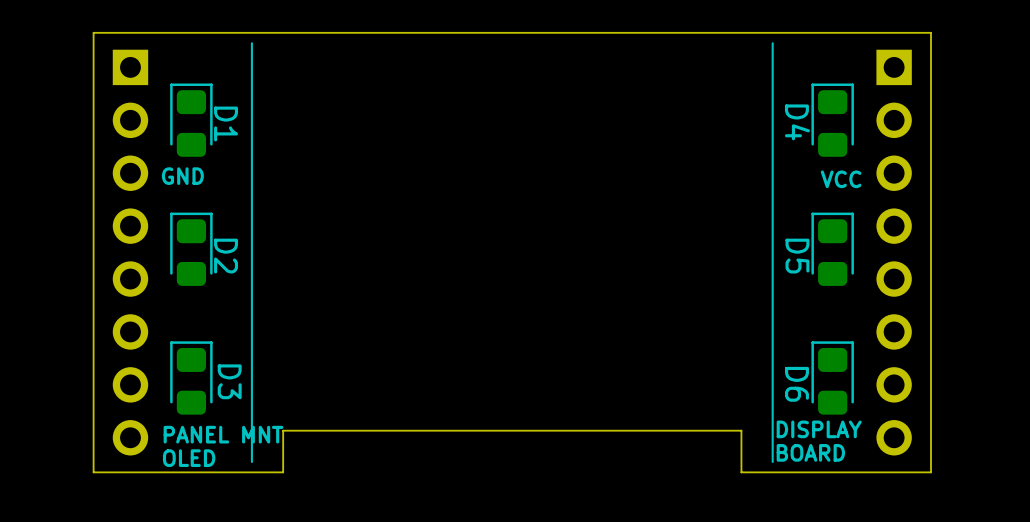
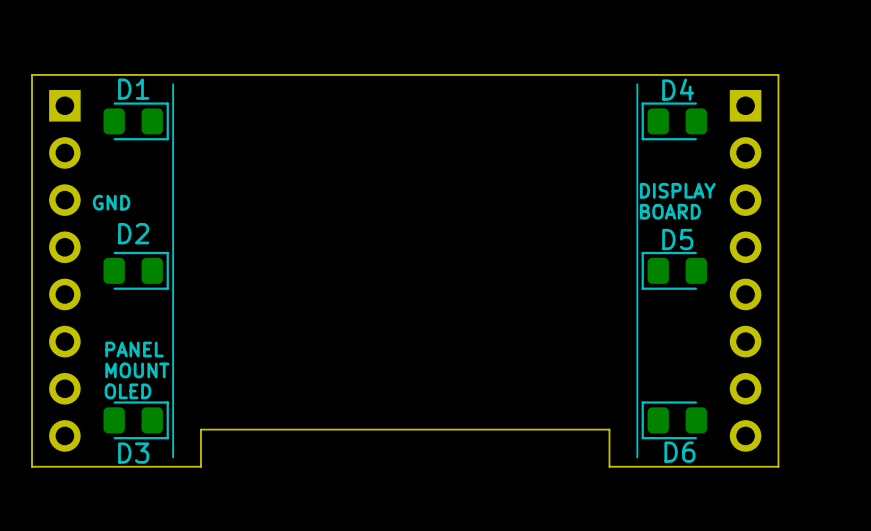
D1 rotation: 0° (191, 120) -> 90° clockwise (136, 121)
D4 rotation: 0° (832, 120) -> 90° counterclockwise (674, 121)
D4 name position: D4 (797, 122) -> D4 (678, 89)
D1 name position: D1 (226, 123) -> D1 (133, 89)
text: VCC (841, 179) -> none
D2 rotation: 0° (191, 249) -> 90° clockwise (136, 270)
D5 rotation: 0° (832, 249) -> 90° counterclockwise (674, 270)
D2 name position: D2 (226, 256) -> D2 (133, 233)
D5 name position: D5 (797, 256) -> D5 (677, 239)
text: none -> PANEL (134, 349)
text: none -> MOUNT (137, 370)
D3 rotation: 0° (191, 377) -> 90° clockwise (136, 420)
D3 position: (191, 377) -> (136, 420)
D6 rotation: 0° (832, 377) -> 90° counterclockwise (674, 420)
D6 position: (832, 377) -> (674, 420)
text position: DISPLAY (819, 429) -> DISPLAY (677, 190)
text: PANEL MNT (223, 434) -> none
text position: BOARD (810, 452) -> BOARD (670, 211)
text position: OLED (189, 458) -> OLED (128, 391)

